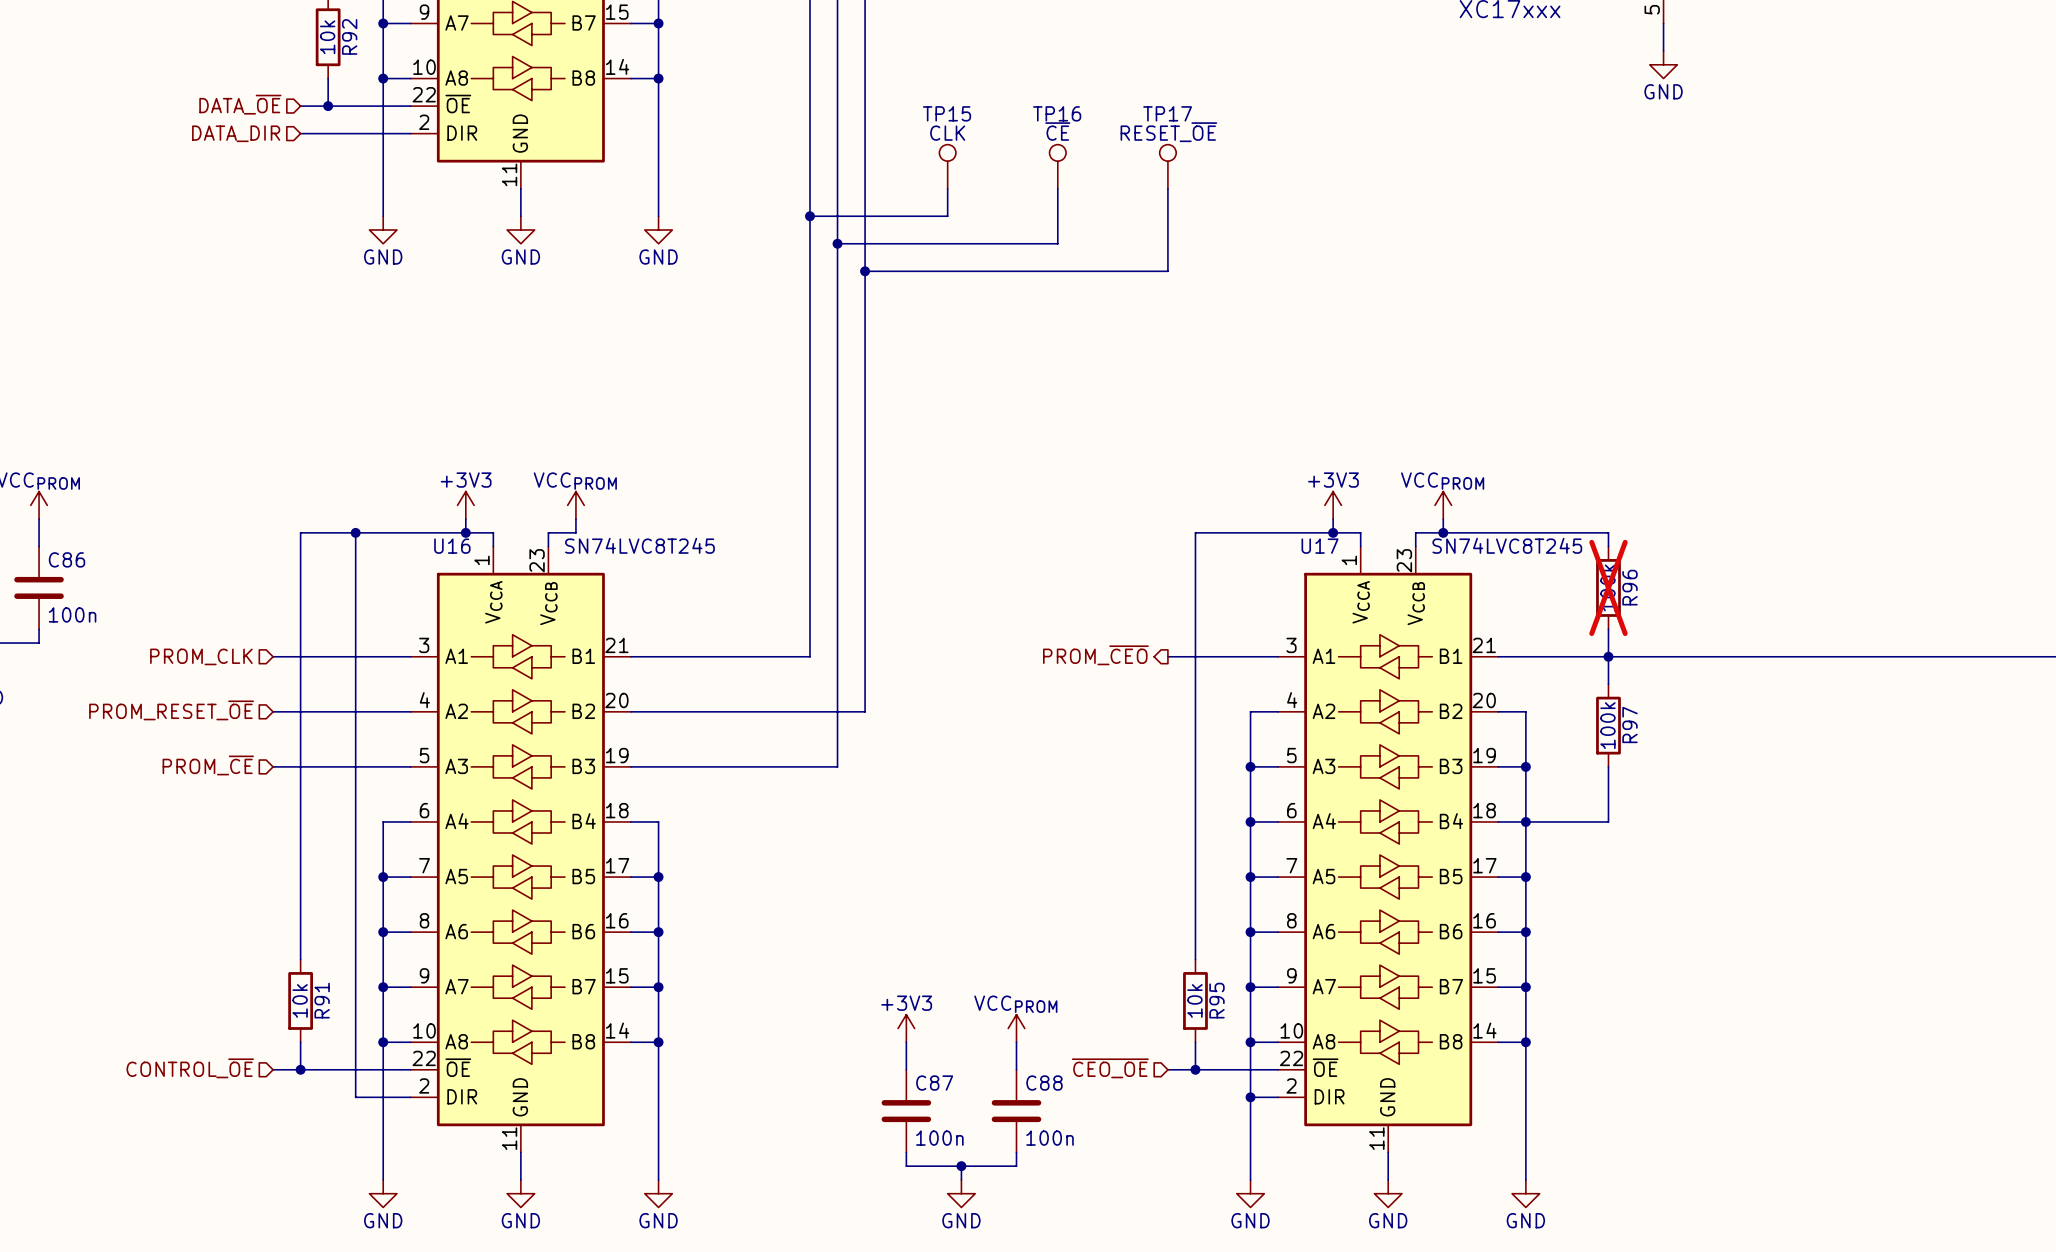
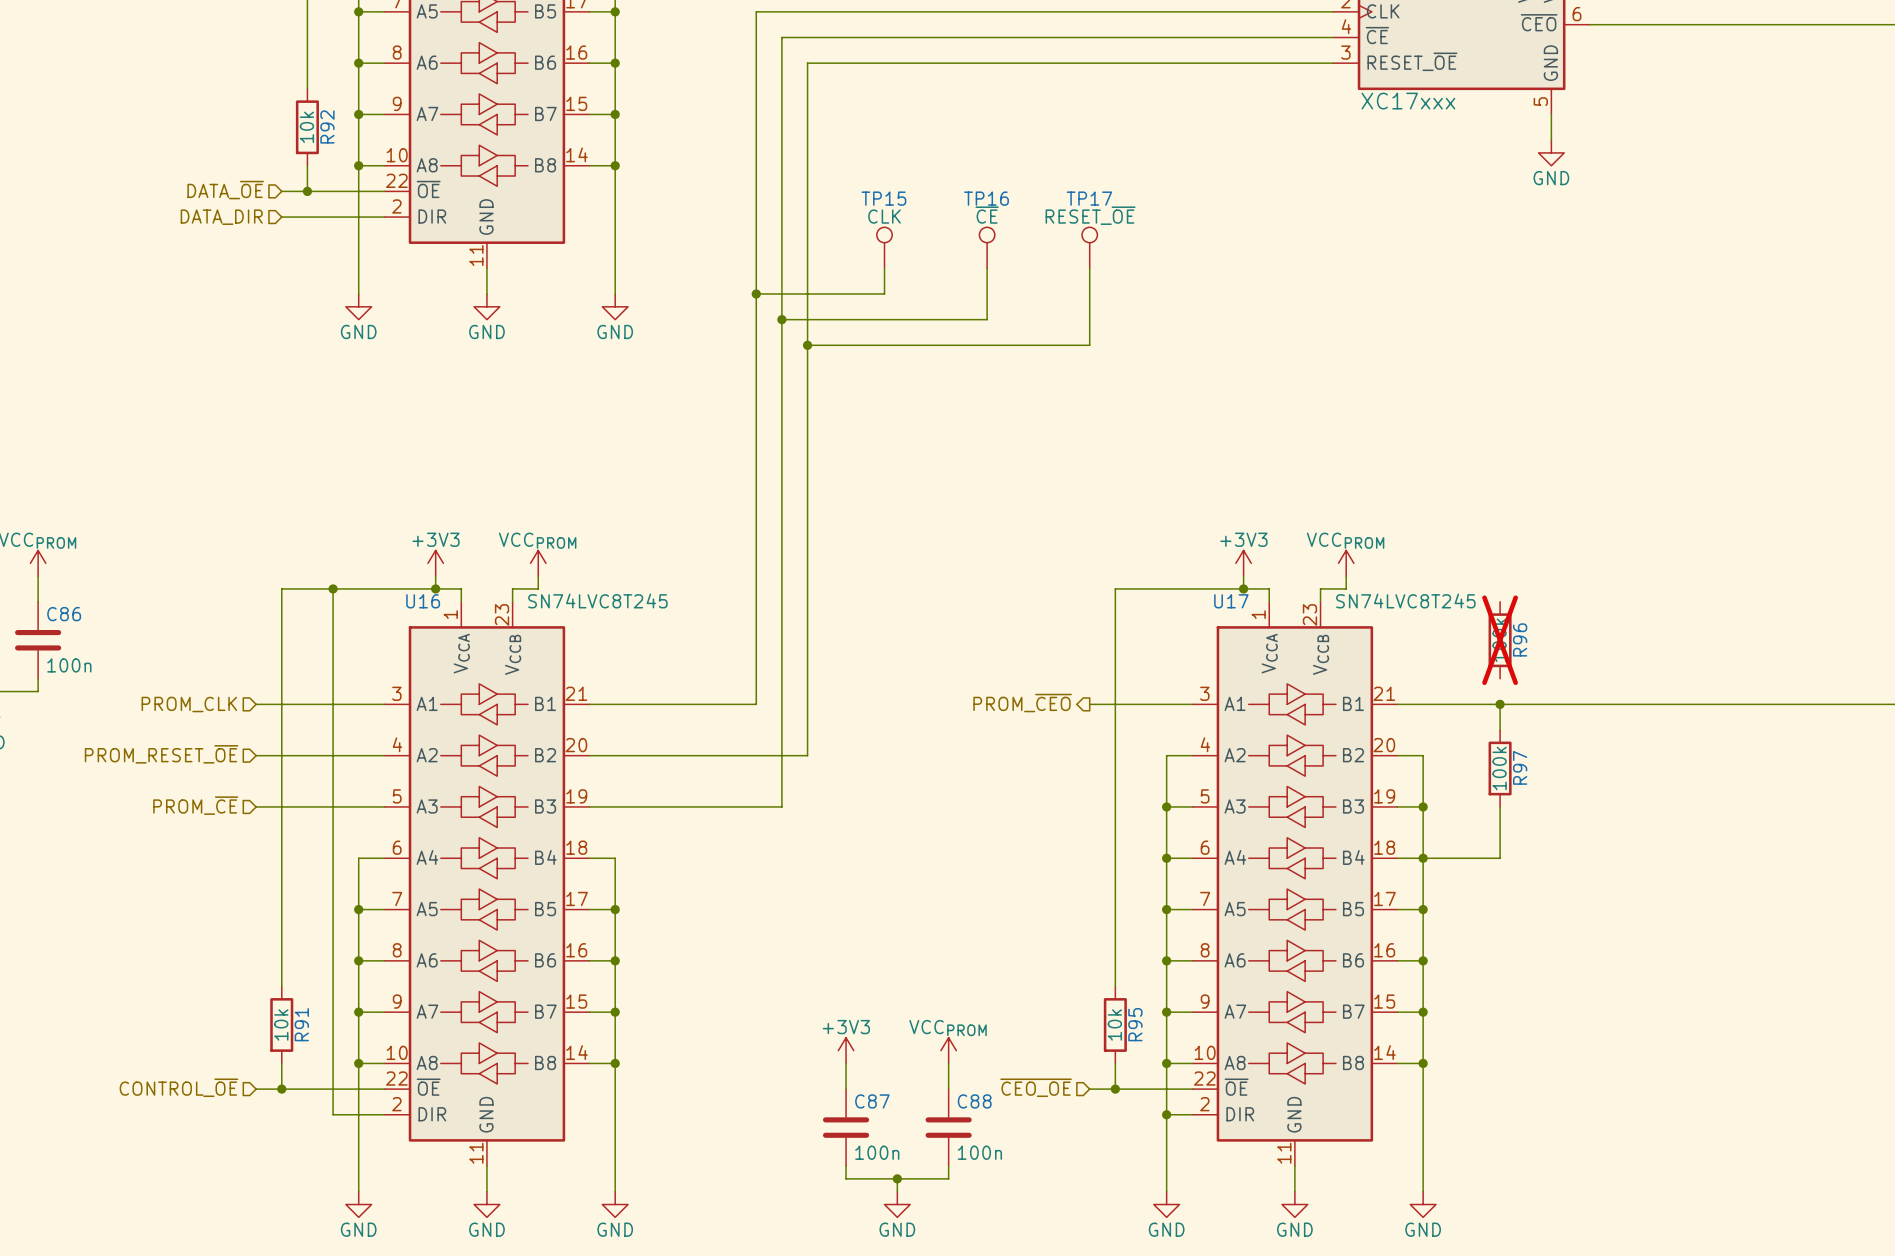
wire: (1443, 532) (1608, 532) (1608, 546) -> none
junction: (1443, 532) -> none
wire: (1608, 629) (1608, 656) -> none

